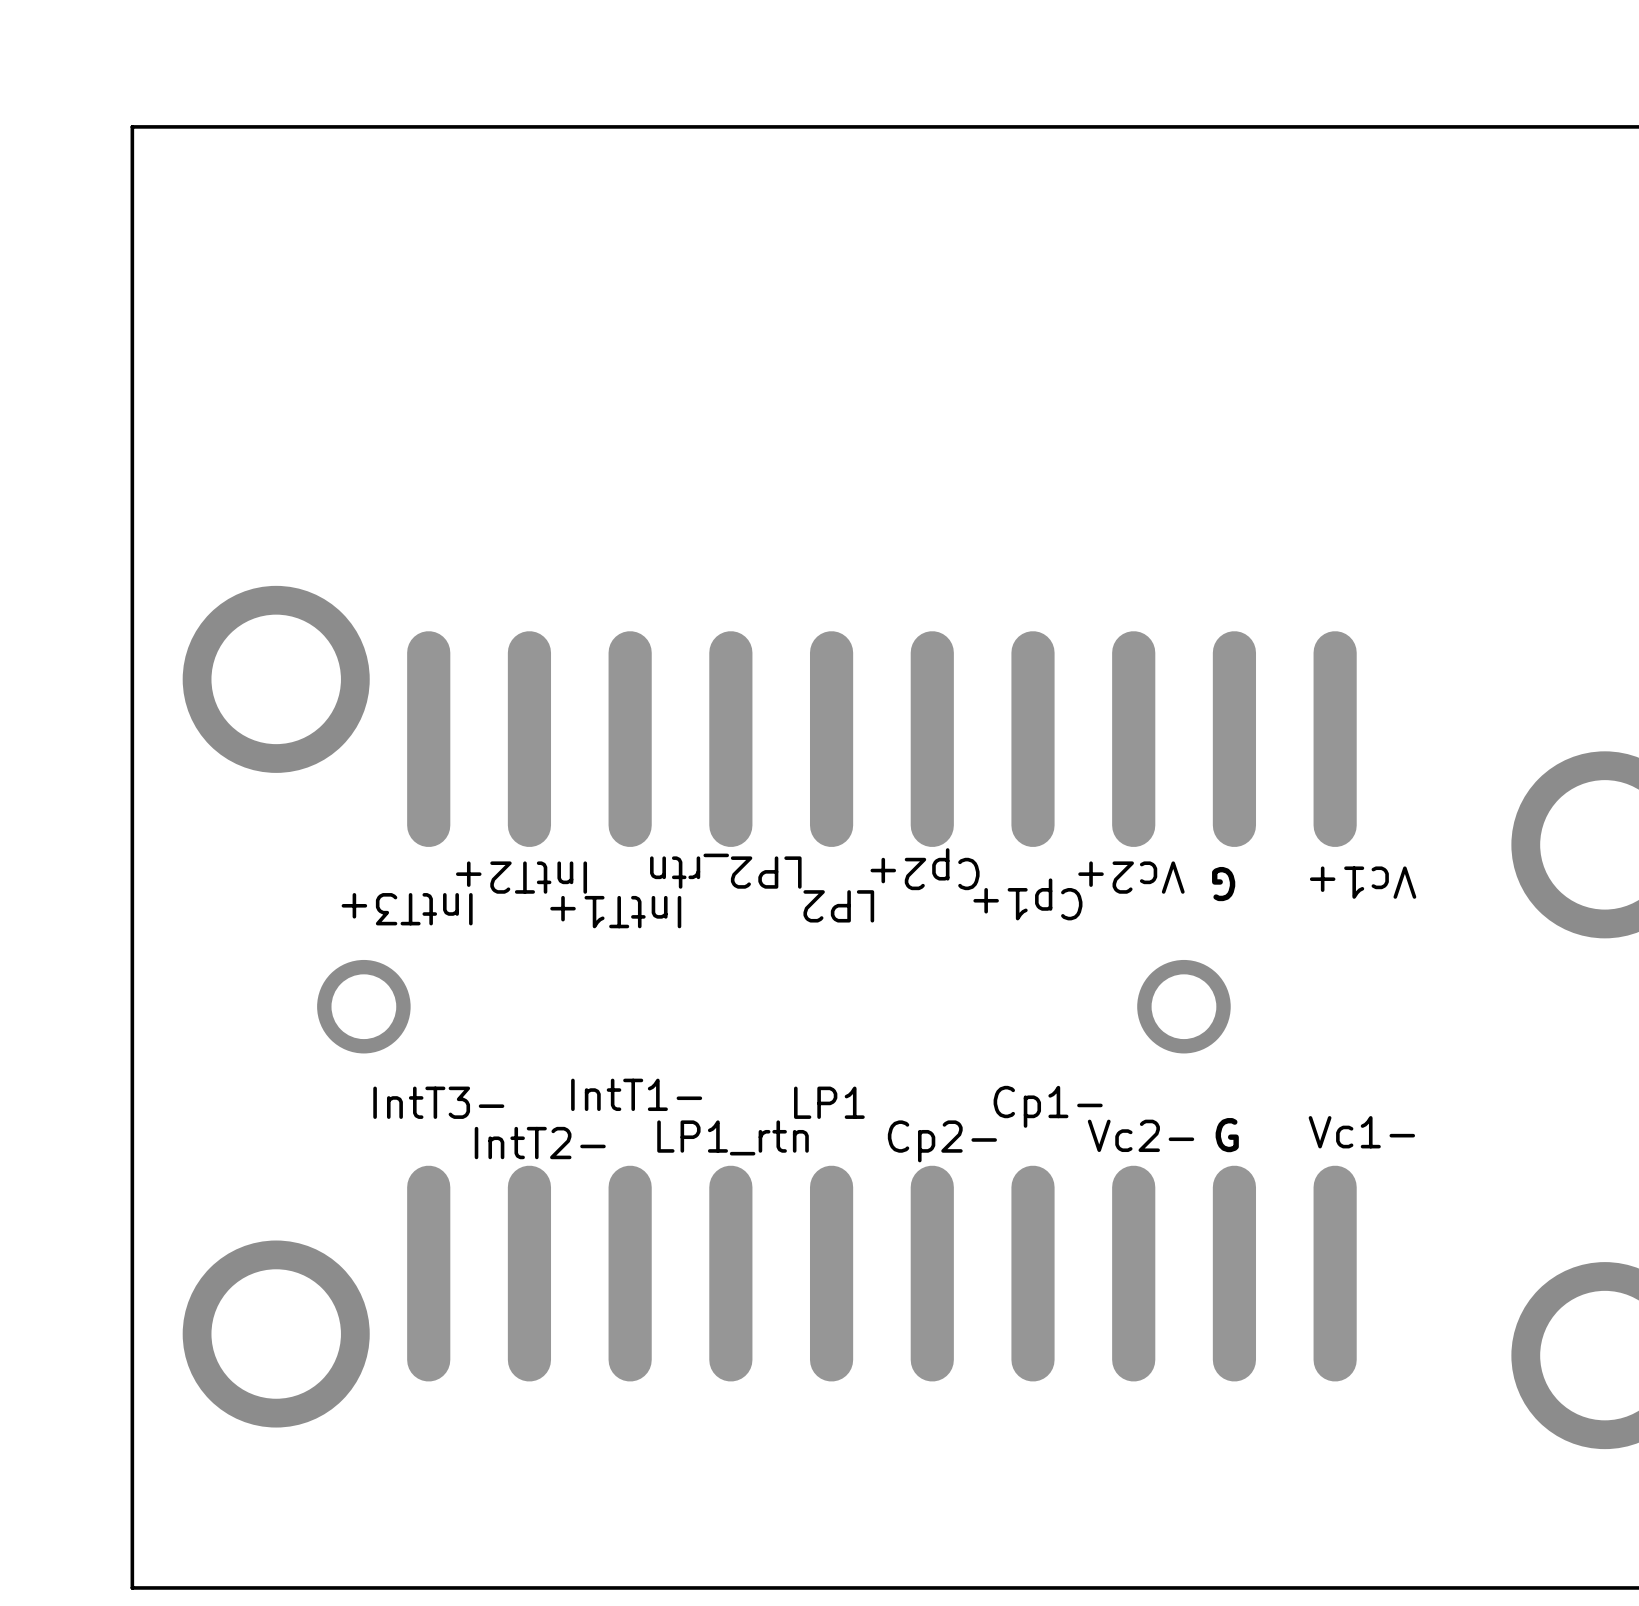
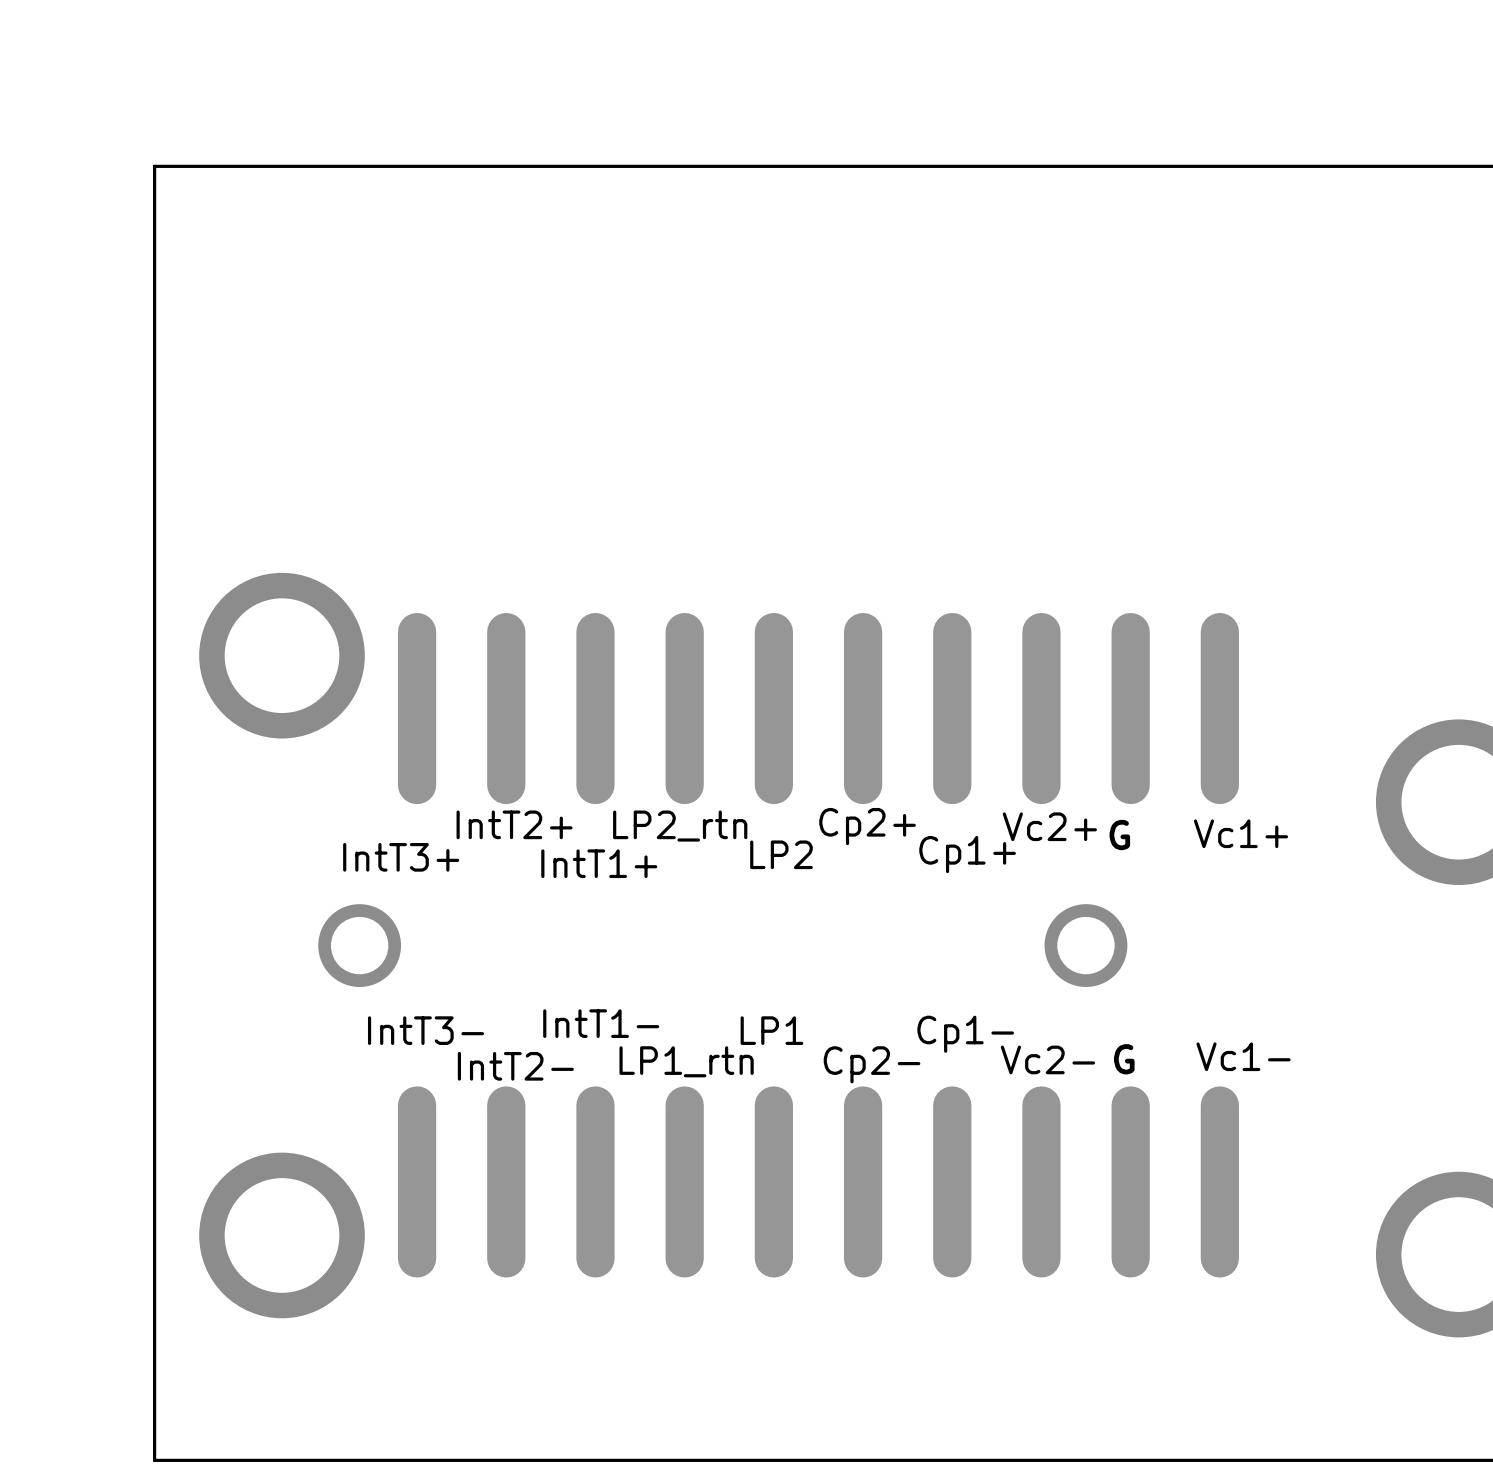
text rotation: 0° (925, 869) -> 180° (867, 826)
text rotation: 0° (725, 871) -> 180° (680, 826)
text rotation: 0° (521, 877) -> 180° (514, 824)
text rotation: 0° (1131, 877) -> 180° (1049, 826)
text rotation: 0° (1363, 882) -> 180° (1240, 833)
text rotation: 0° (1223, 884) -> 180° (1119, 835)
text rotation: 0° (1027, 899) -> 180° (967, 854)
text rotation: 0° (838, 906) -> 180° (781, 854)
text rotation: 0° (407, 909) -> 180° (401, 857)
text rotation: 0° (615, 912) -> 180° (599, 863)

